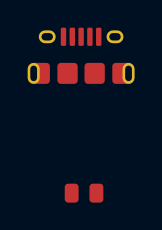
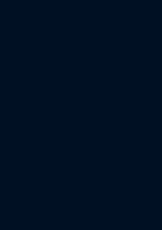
part: (81, 55) -> none
part: (84, 193) -> none

